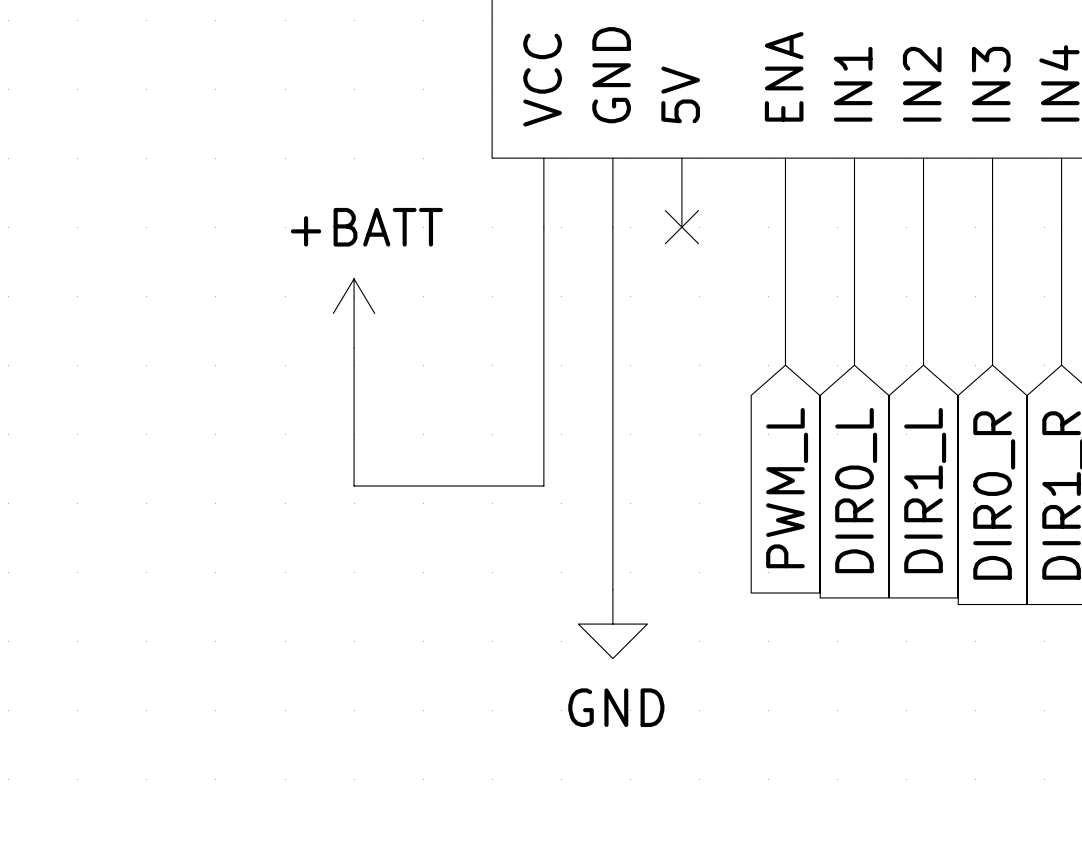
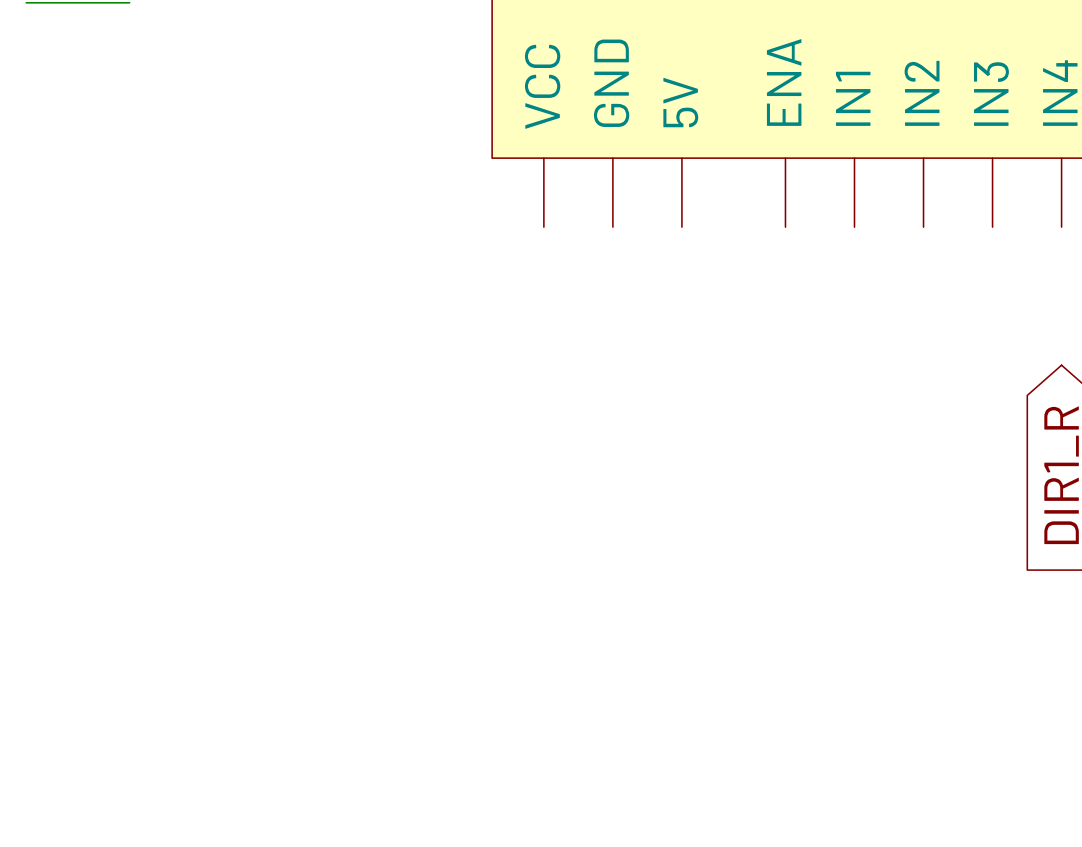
wire: none -> (26, 2) (129, 2)
wire: (543, 227) (543, 486) (354, 486) (354, 347) -> none
wire: (612, 227) (612, 589) -> none
no-connect mark: (681, 227) -> none
wire: (785, 227) (785, 365) -> none
wire: (854, 227) (854, 365) -> none
wire: (923, 227) (923, 365) -> none
wire: (992, 227) (992, 365) -> none
wire: (1061, 227) (1061, 365) -> none
power symbol: +BATT (354, 313) -> none
global label: PWM_L (787, 488) -> none
global label: DIR0_L (856, 490) -> none
global label: DIR1_L (925, 490) -> none
global label: DIR0_R (994, 495) -> none
power symbol: GND (612, 624) -> none

